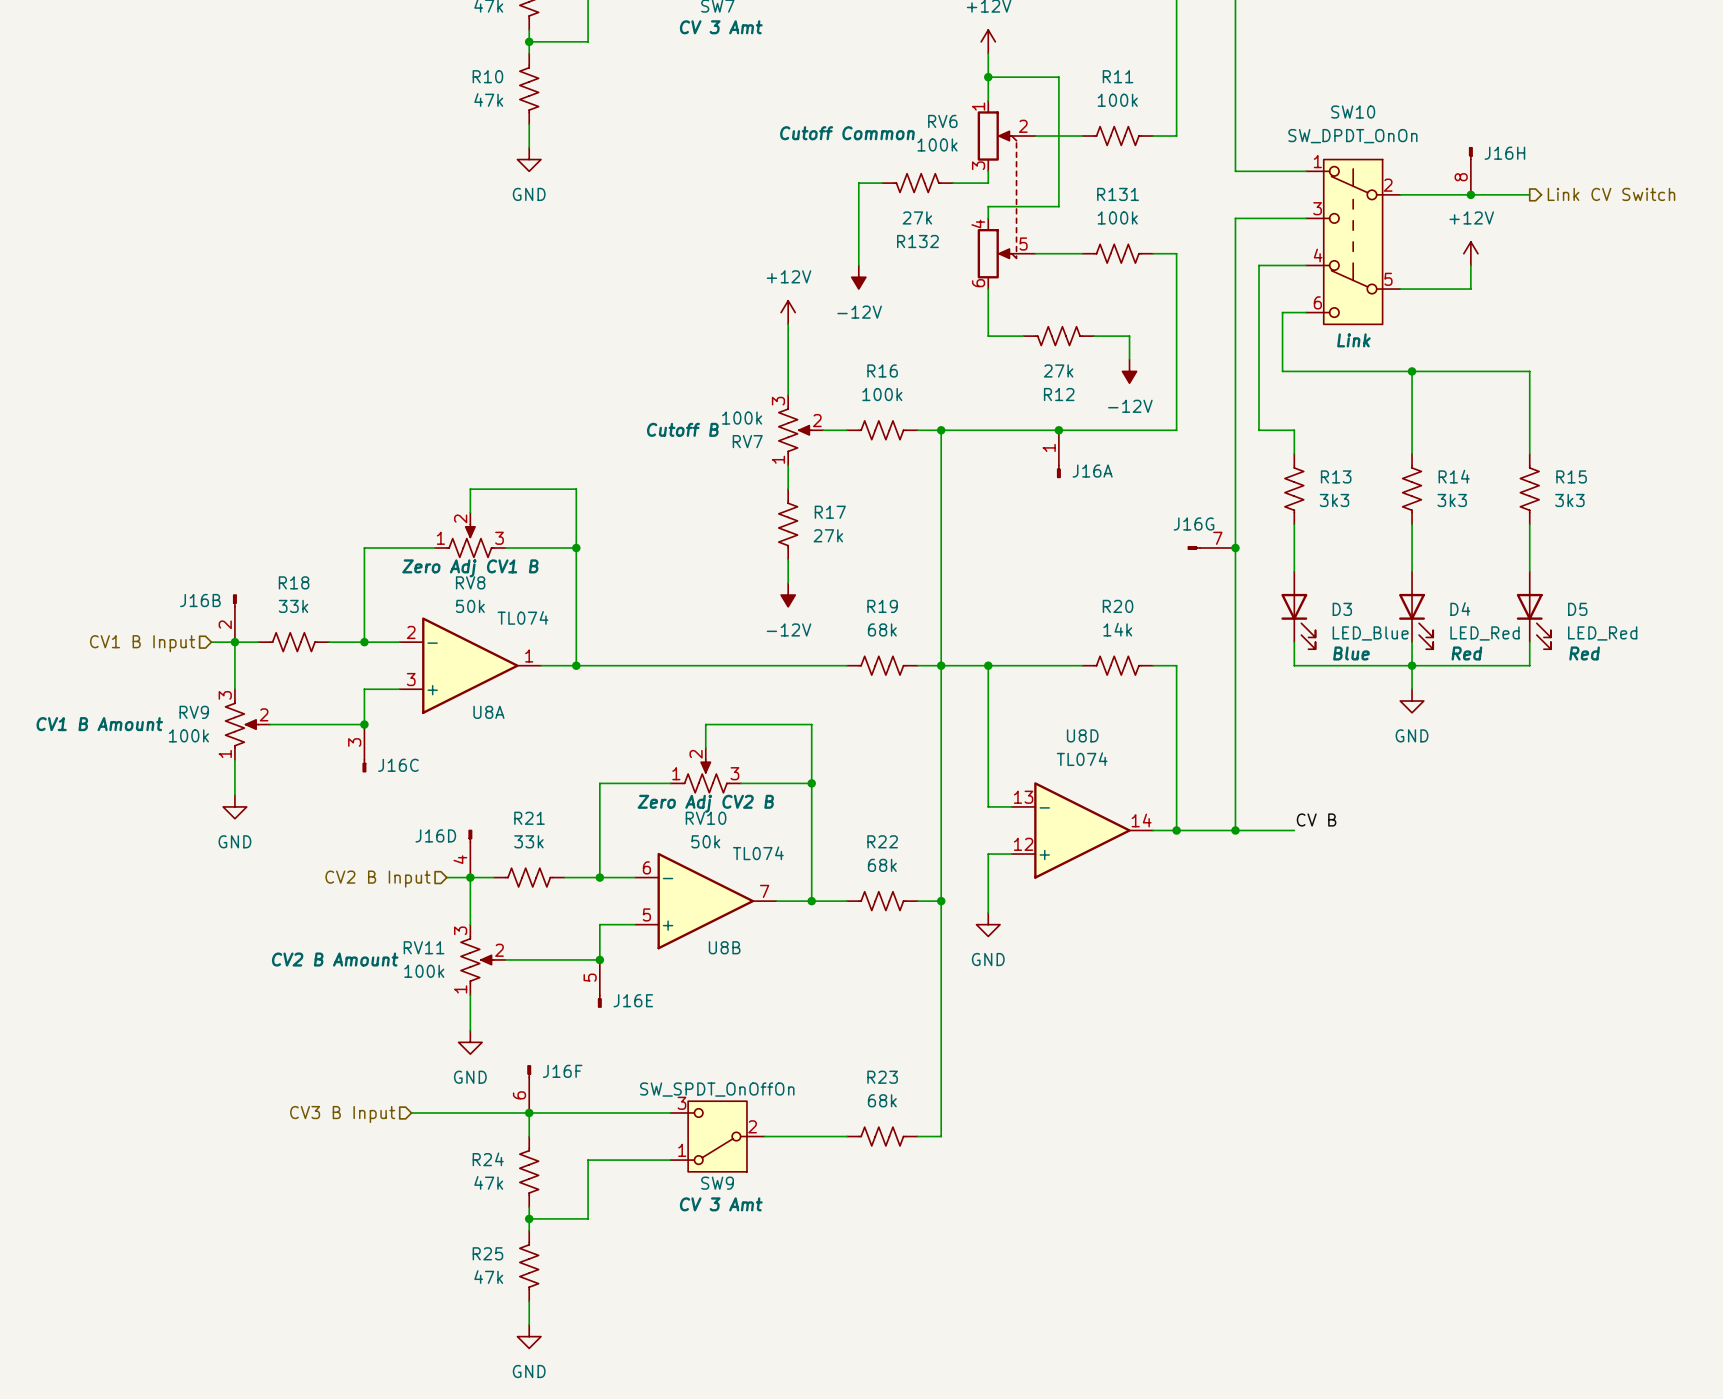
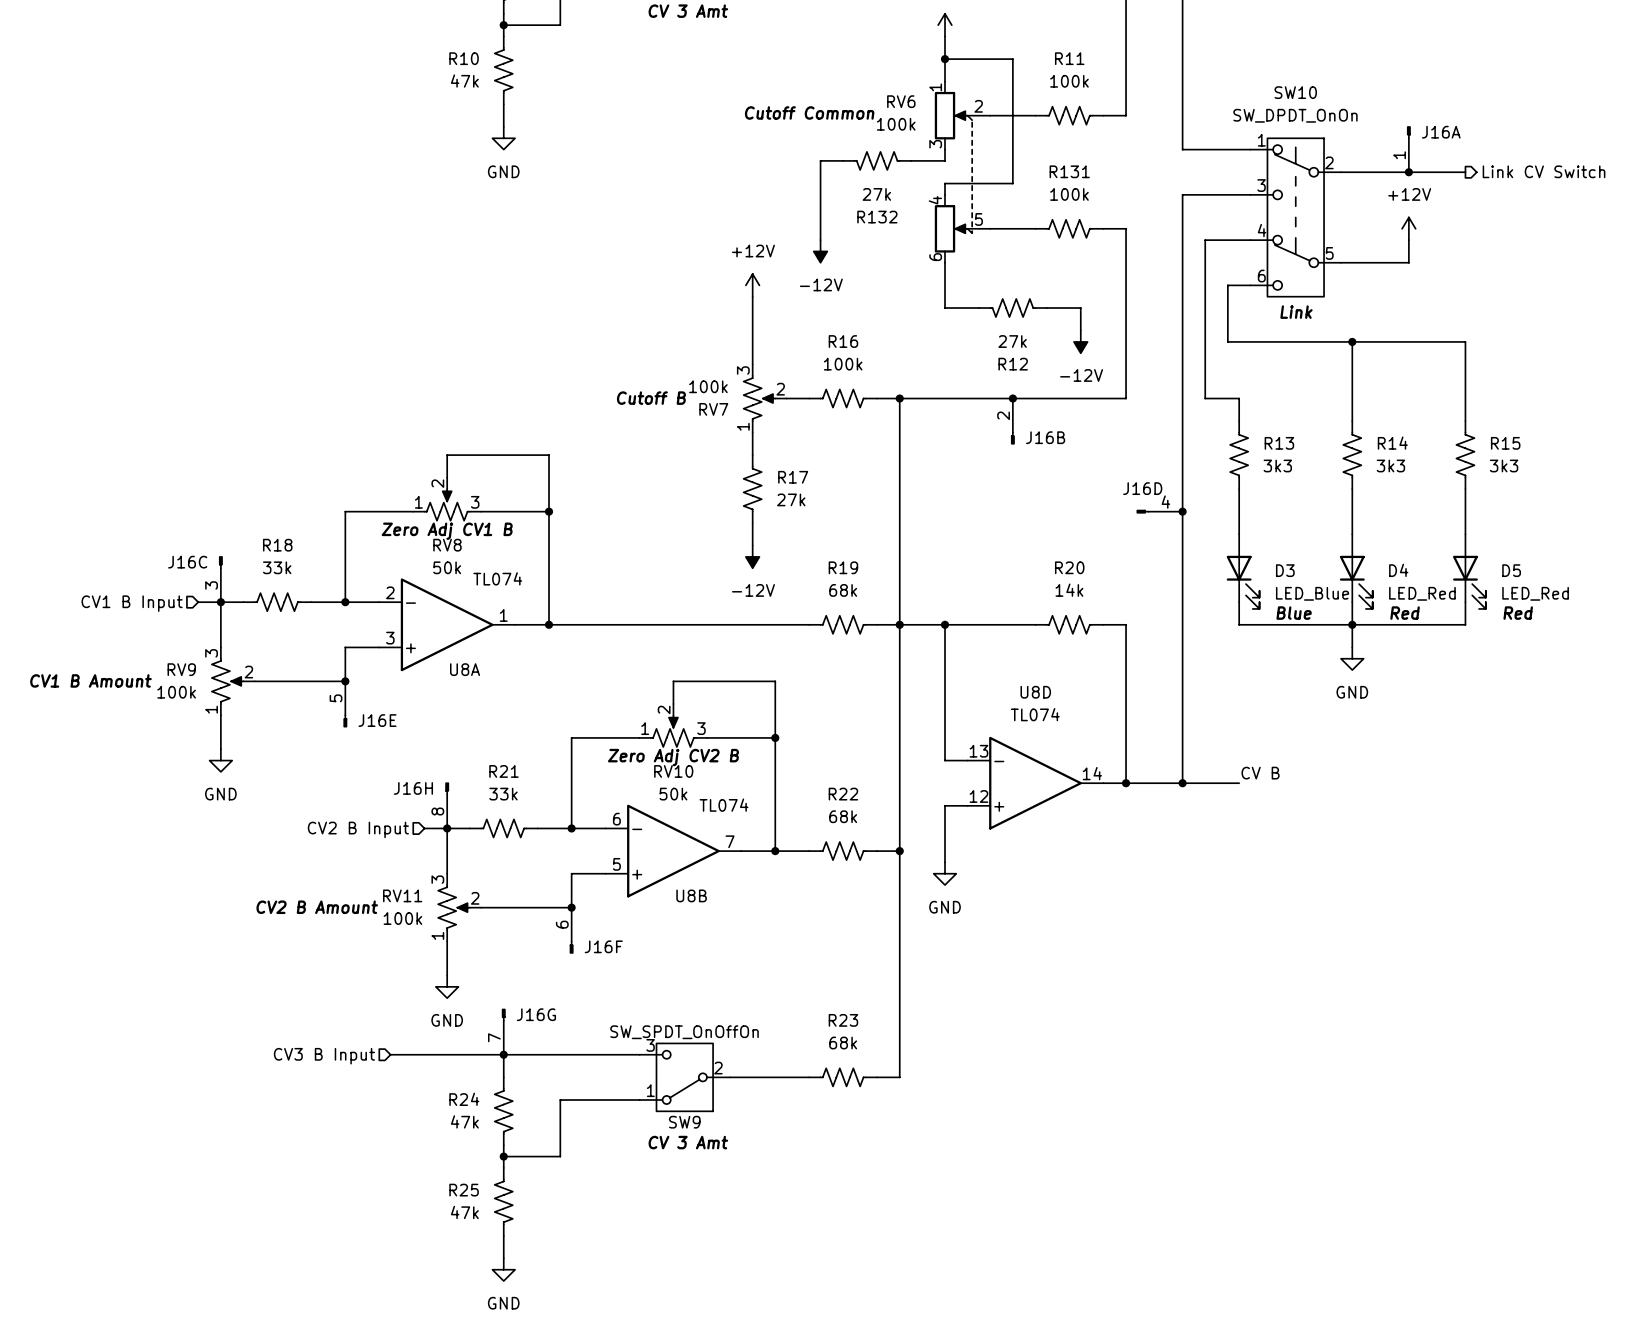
J16H name position: J16H (1504, 153) -> J16H (413, 788)
J16H position: (1470, 170) -> (447, 805)
J16A position: (1058, 454) -> (1408, 149)
J16A rotation: 0° (1058, 471) -> 180° (1408, 132)
J16A name position: J16A (1092, 471) -> J16A (1441, 132)
J16G rotation: 0° (1194, 547) -> 90° clockwise (503, 1015)
J16G position: (1211, 547) -> (503, 1031)
J16B rotation: 0° (234, 600) -> 180° (1012, 438)
J16B position: (234, 618) -> (1012, 421)
J16C position: (364, 748) -> (220, 579)
J16C rotation: 0° (364, 765) -> 180° (220, 562)
J16D name position: J16D (435, 835) -> J16D (1142, 488)
J16D rotation: 0° (470, 836) -> 90° counterclockwise (1143, 511)
J16D position: (470, 853) -> (1159, 511)
J16E position: (599, 983) -> (345, 704)
J16F rotation: 0° (529, 1071) -> 180° (571, 947)
J16F name position: J16F (562, 1071) -> J16F (603, 946)
J16F position: (529, 1089) -> (571, 930)

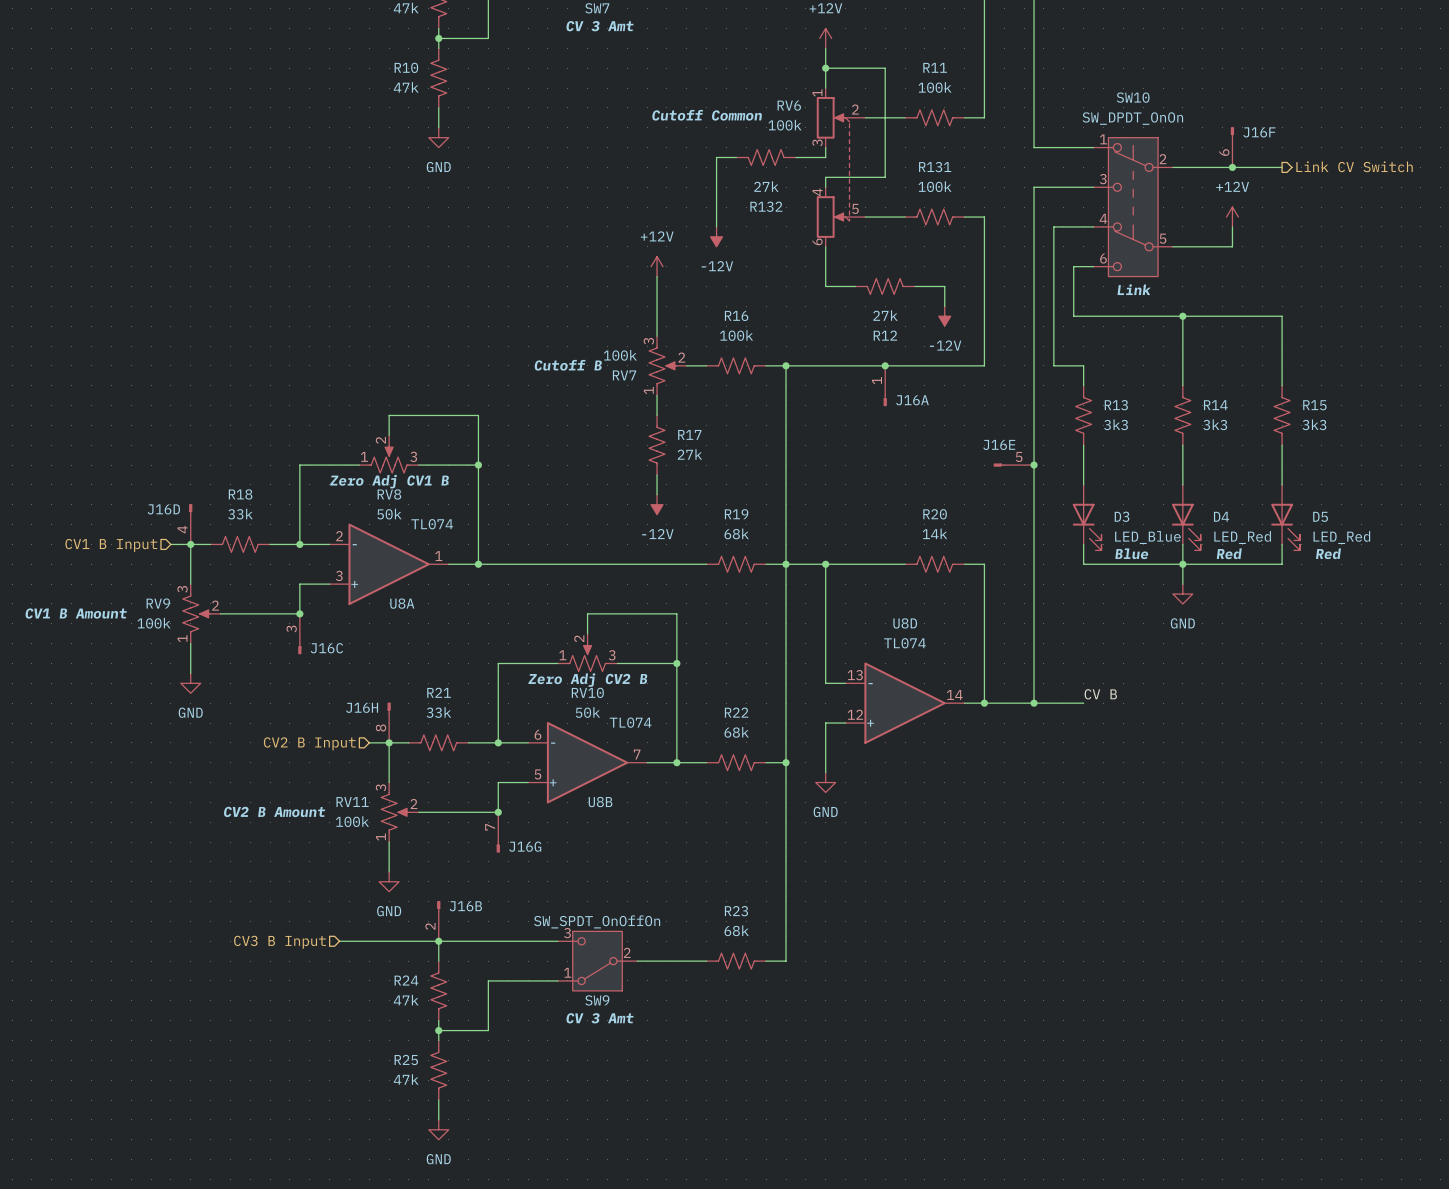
J16A rotation: 0° (1408, 132) -> 180° (885, 400)
J16A name position: J16A (1441, 132) -> J16A (912, 400)
J16A position: (1408, 149) -> (885, 385)
J16B position: (1012, 421) -> (438, 921)
J16B name position: J16B (1045, 437) -> J16B (465, 906)
J16B rotation: 0° (1012, 438) -> 180° (438, 906)
J16D name position: J16D (1142, 488) -> J16D (163, 509)
J16D rotation: 0° (1143, 511) -> 90° clockwise (190, 509)
J16D position: (1159, 511) -> (190, 524)
J16C rotation: 0° (220, 562) -> 180° (299, 648)
J16C position: (220, 579) -> (299, 634)
J16E position: (345, 704) -> (1013, 465)
J16E rotation: 0° (345, 720) -> 90° clockwise (999, 465)
J16E name position: J16E (377, 720) -> J16E (999, 444)
J16F position: (571, 930) -> (1232, 147)
J16F name position: J16F (603, 946) -> J16F (1259, 132)
J16F rotation: 0° (571, 947) -> 180° (1232, 132)
J16G name position: J16G (536, 1014) -> J16G (525, 846)
J16G rotation: 0° (503, 1015) -> 180° (498, 847)
J16G position: (503, 1031) -> (498, 832)

